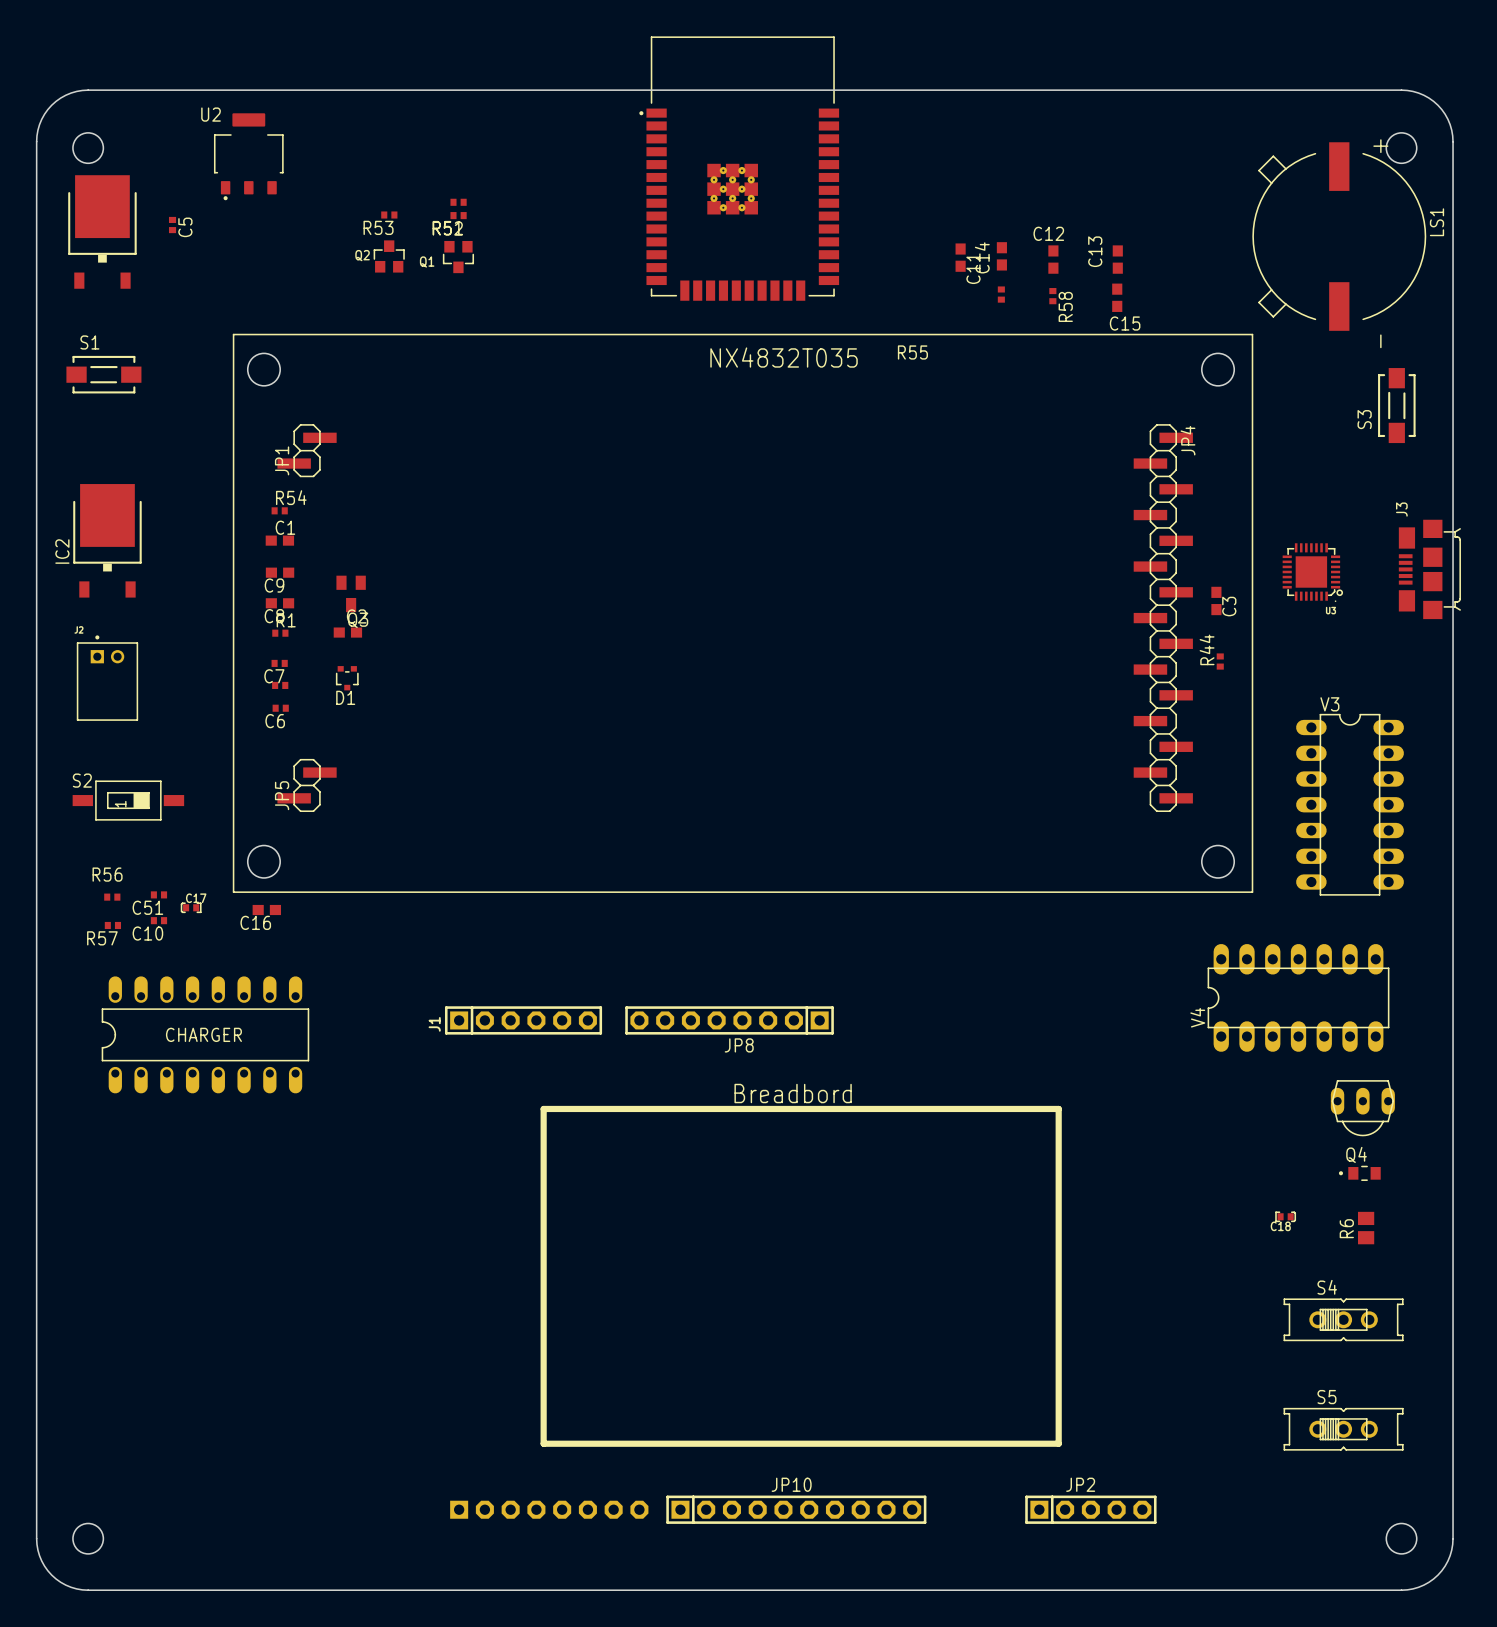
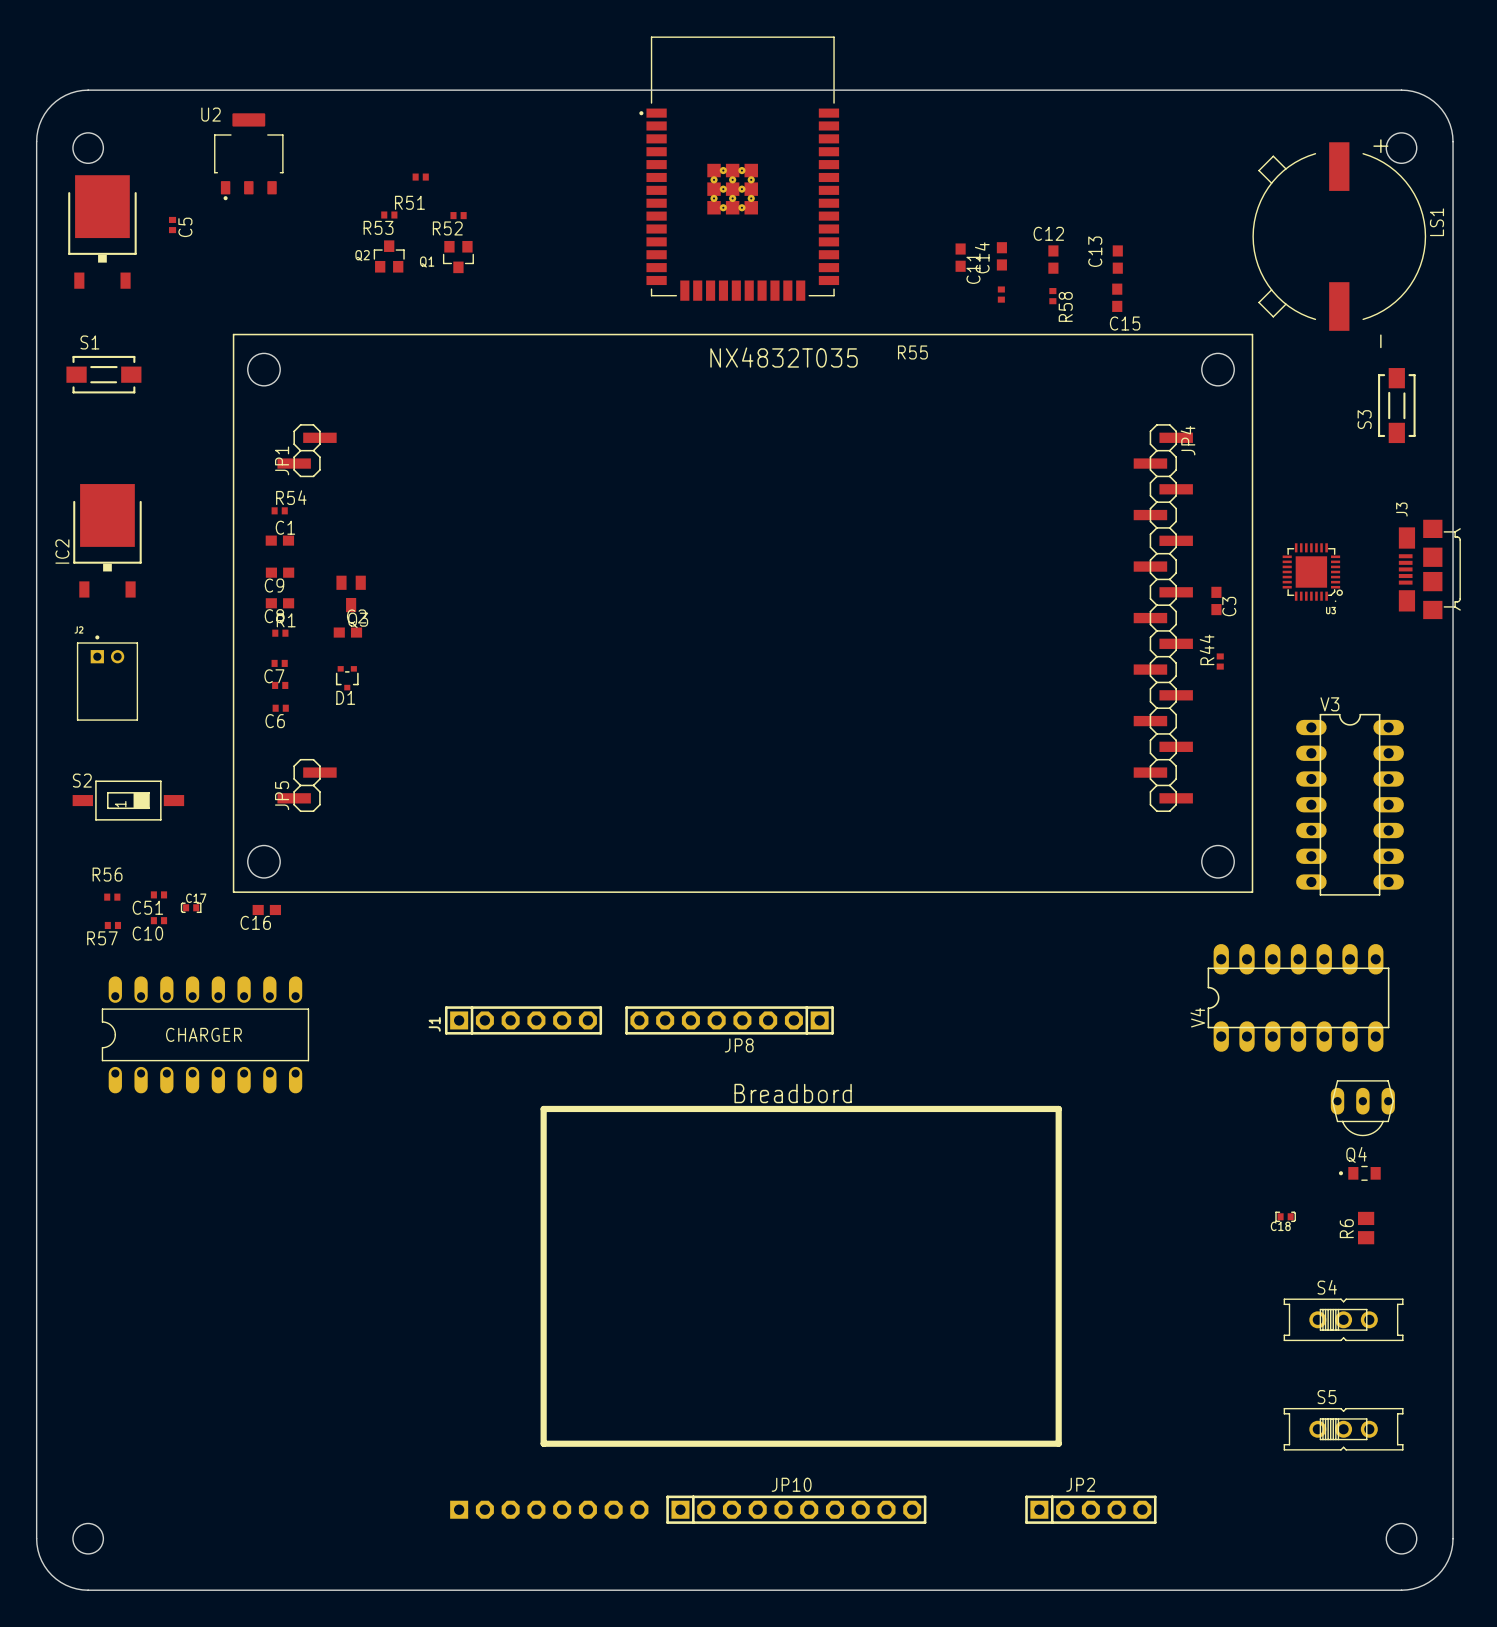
R51 position: (458, 202) -> (420, 177)

